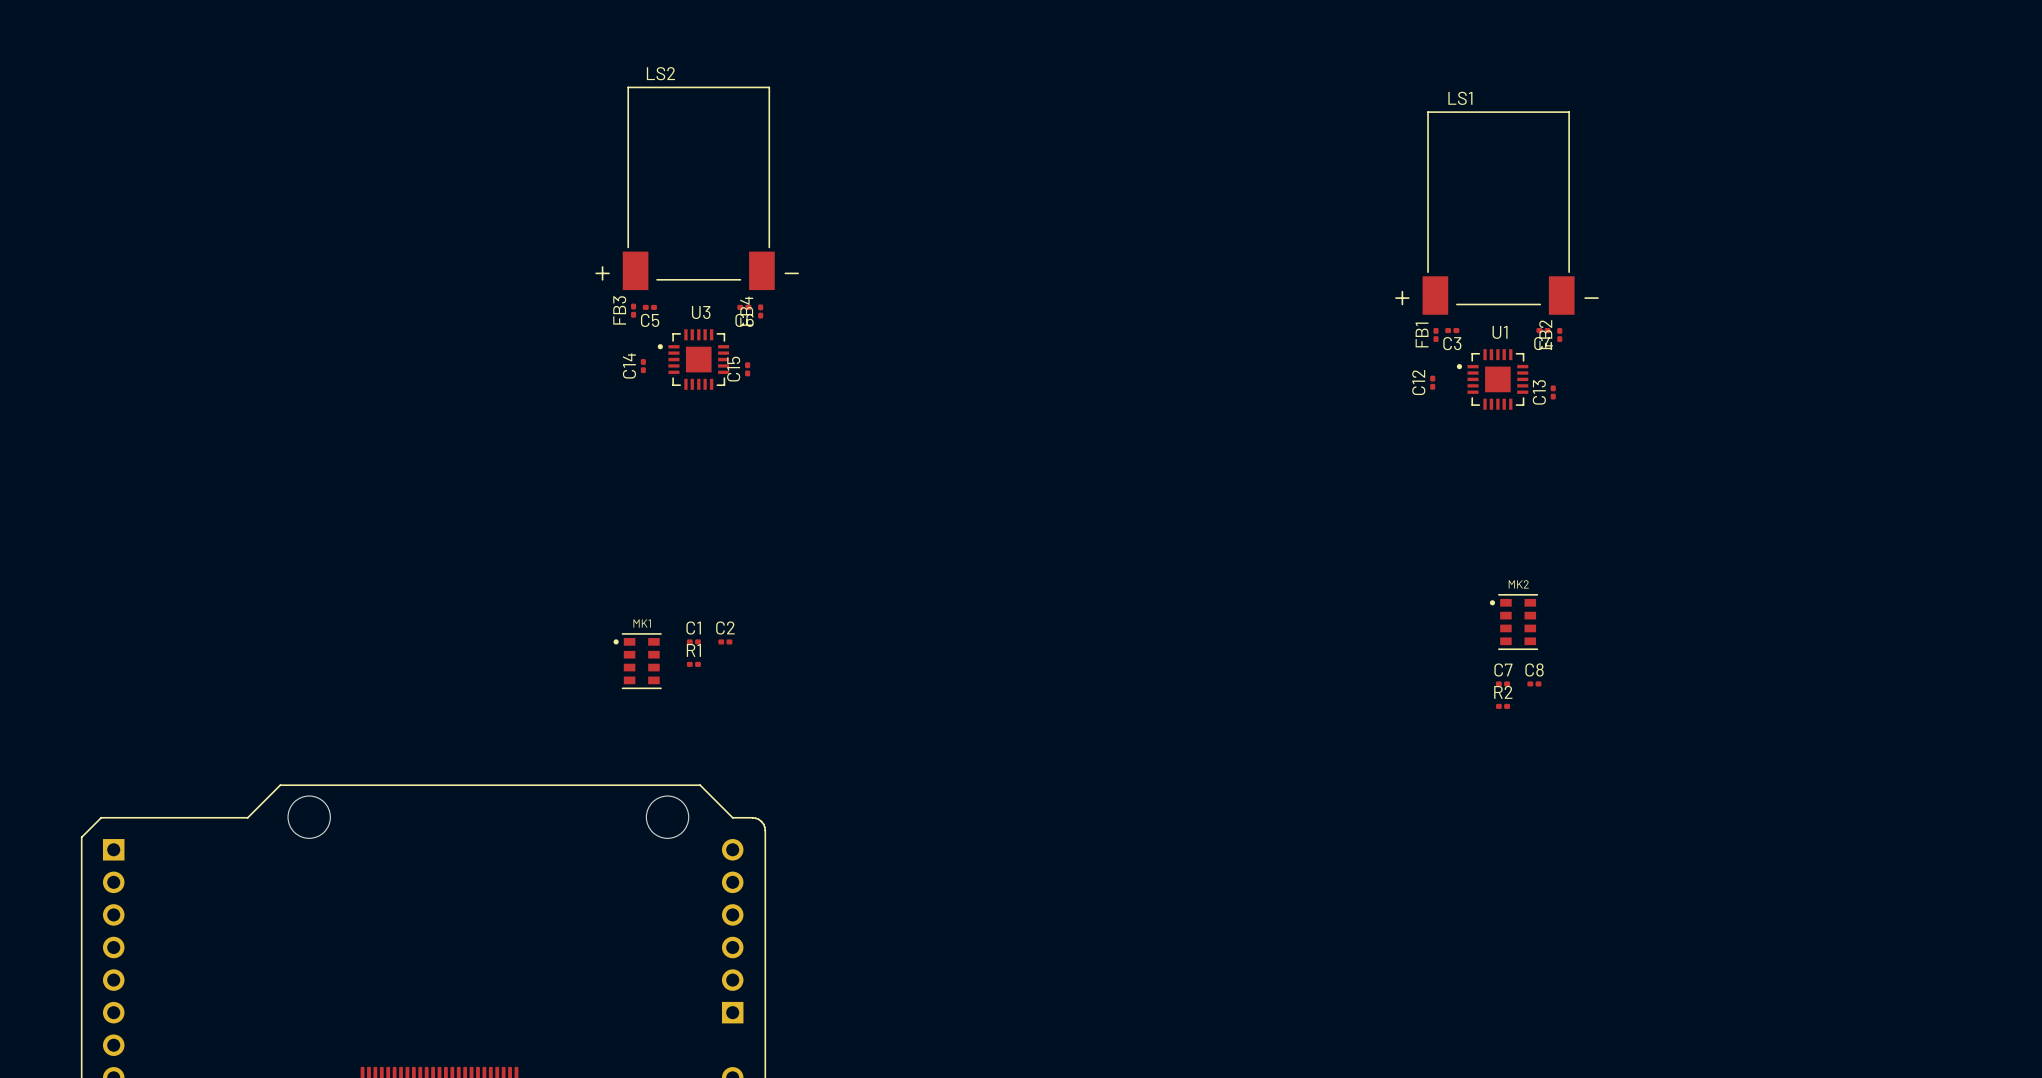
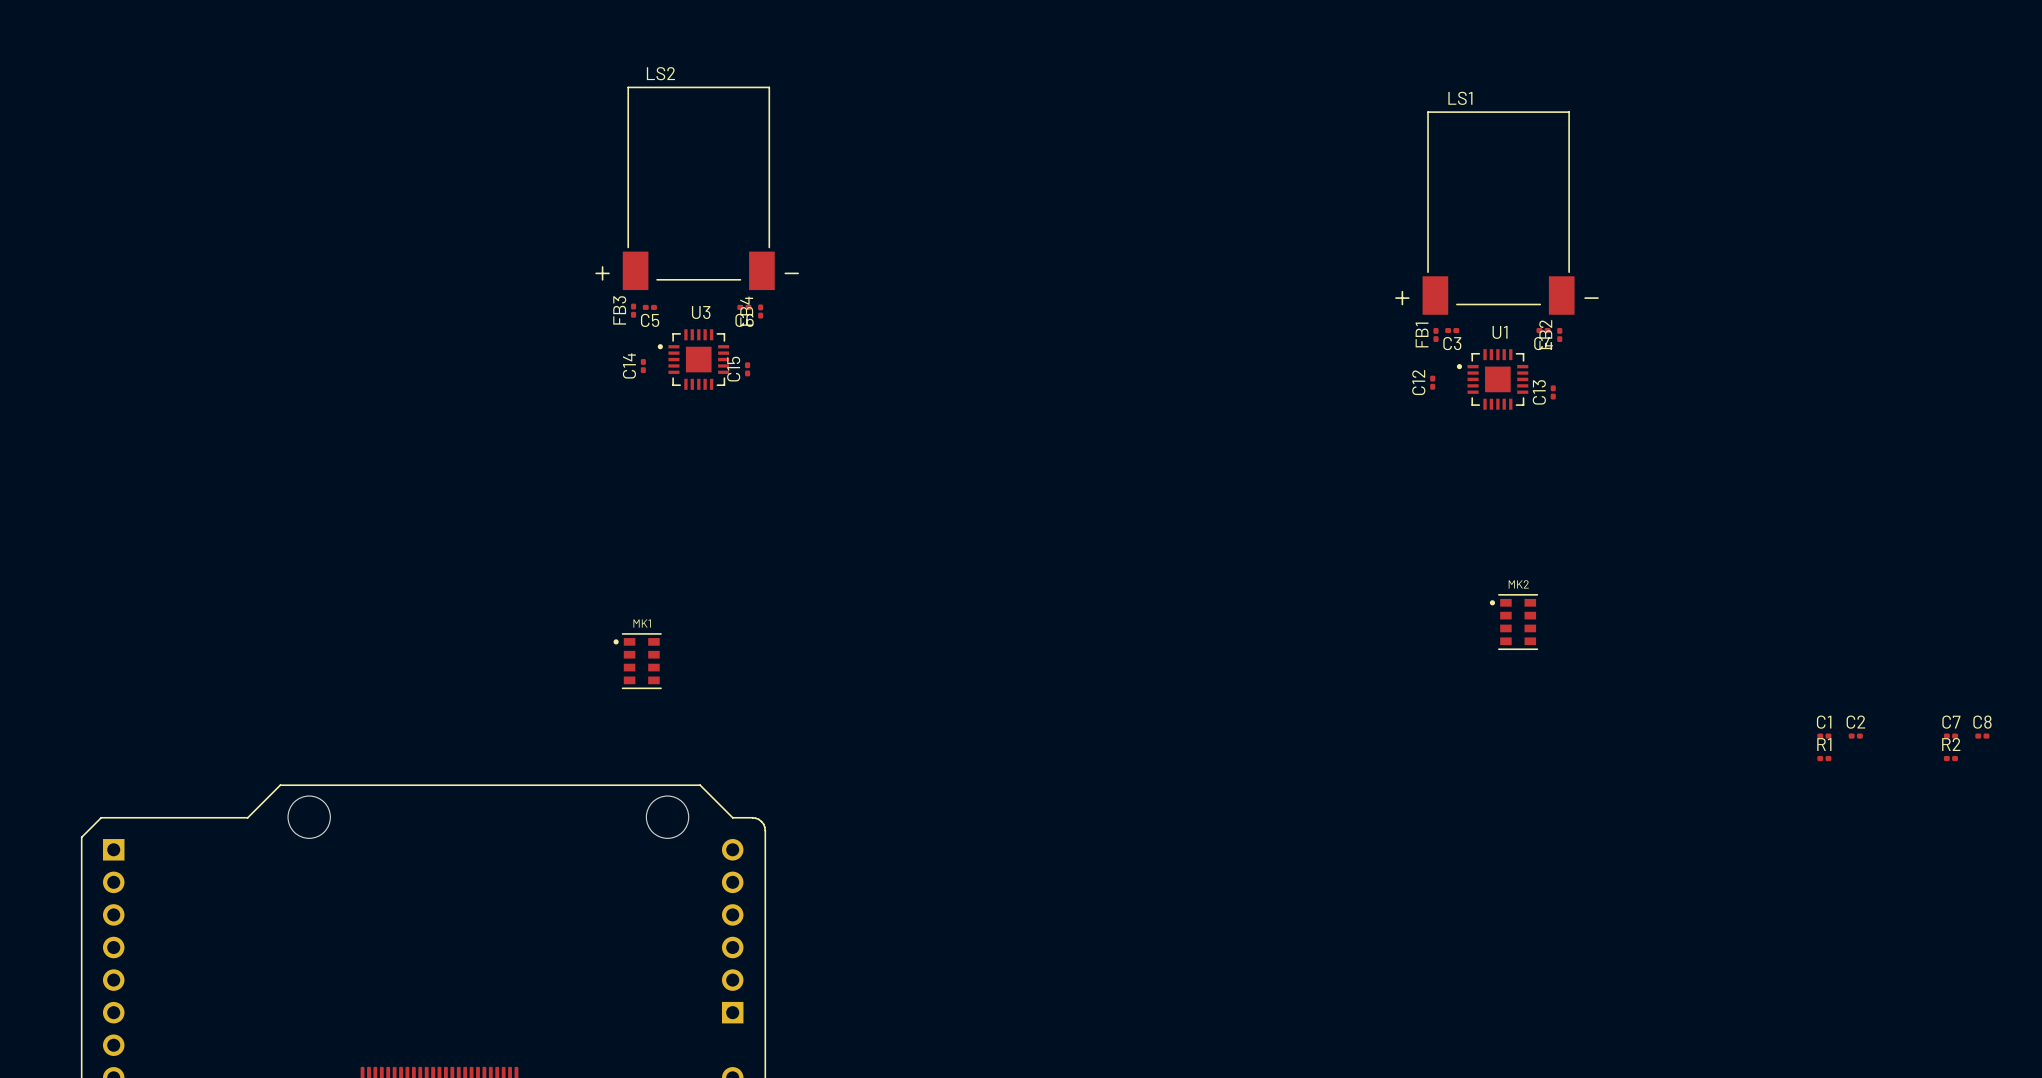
C1 position: (693, 641) -> (1824, 736)
C2 position: (725, 641) -> (1855, 736)
R1 position: (693, 664) -> (1824, 758)
C7 position: (1502, 683) -> (1950, 736)
C8 position: (1534, 683) -> (1982, 736)
R2 position: (1502, 706) -> (1950, 758)

